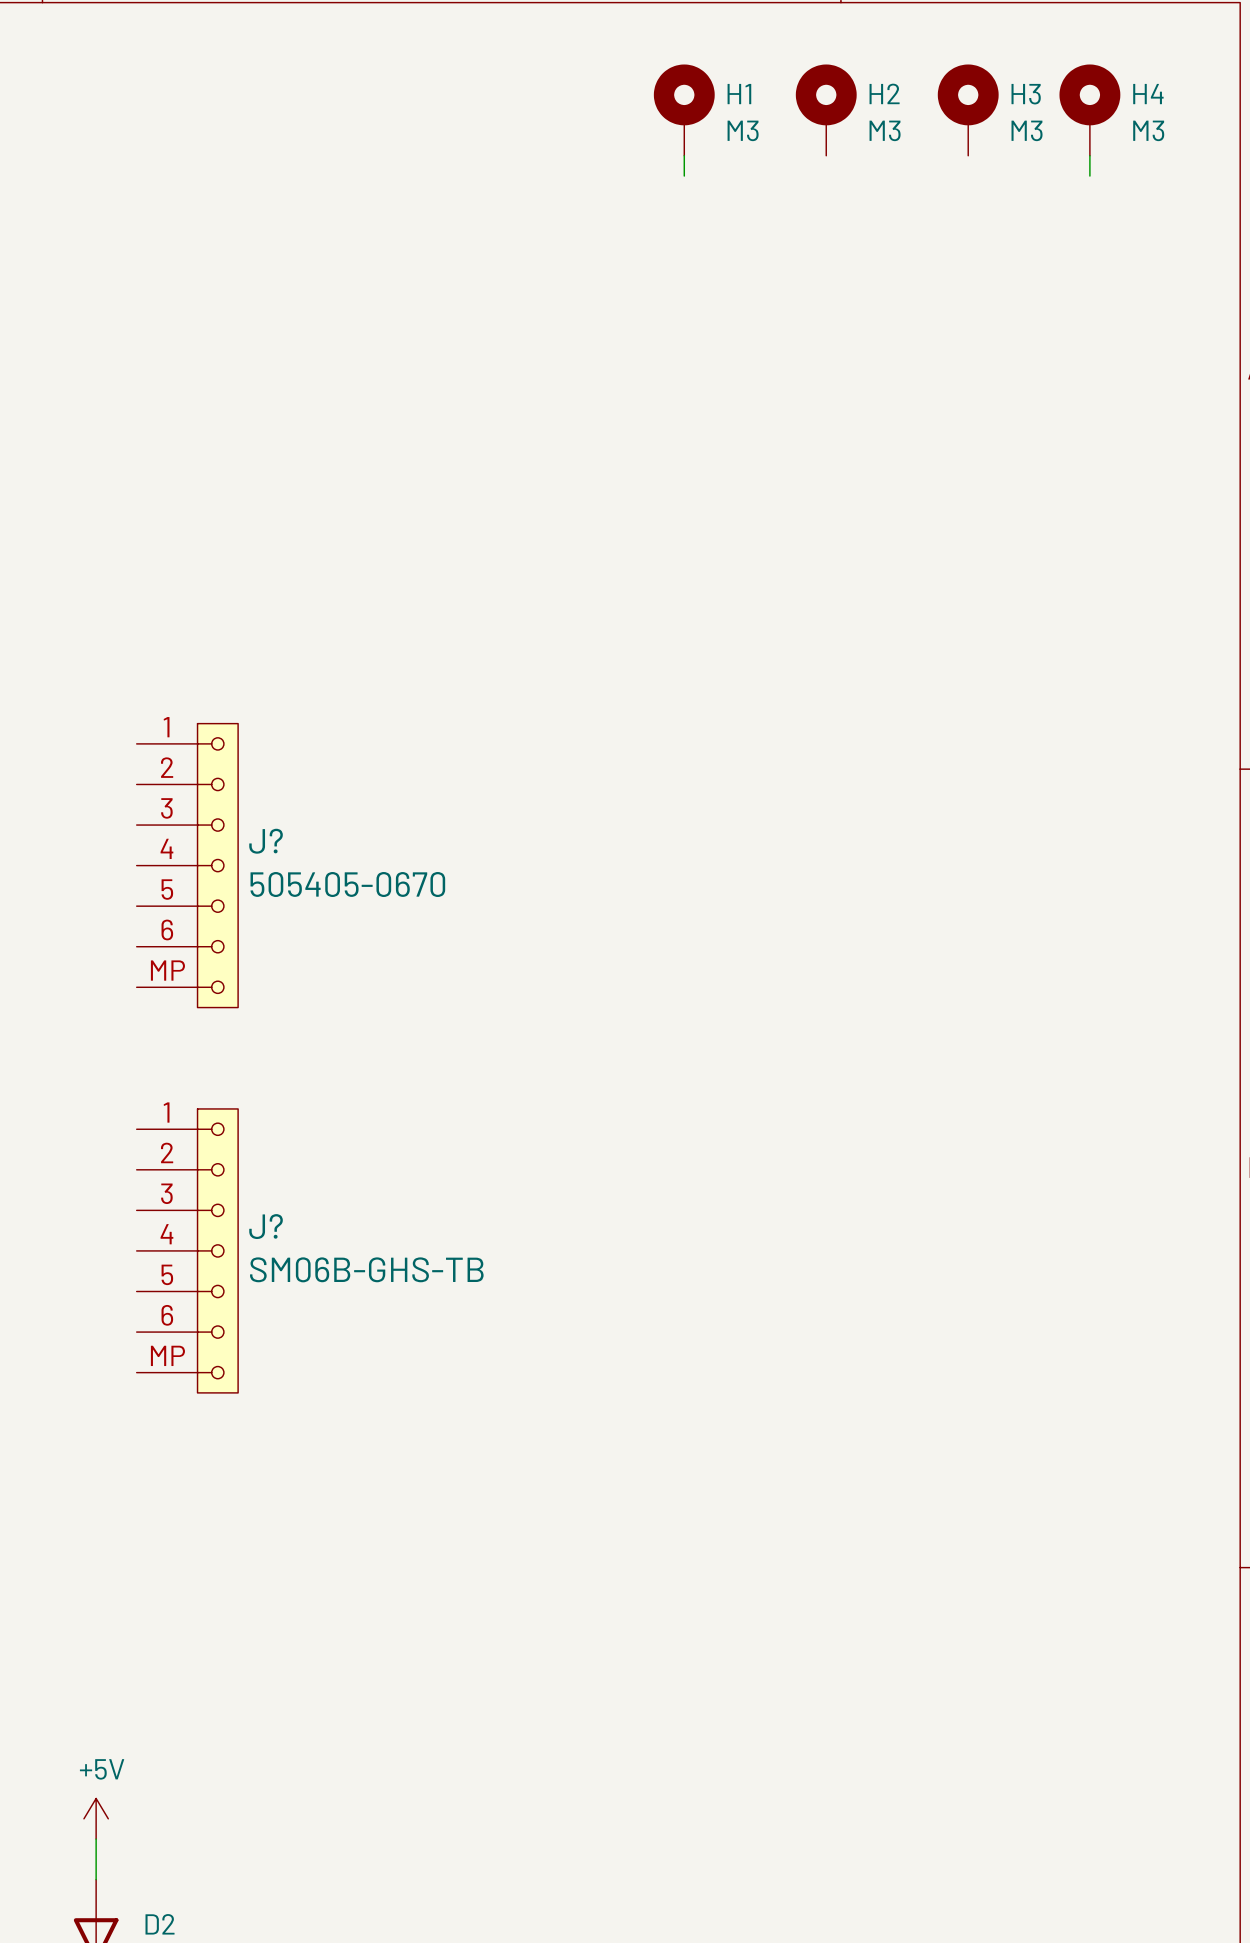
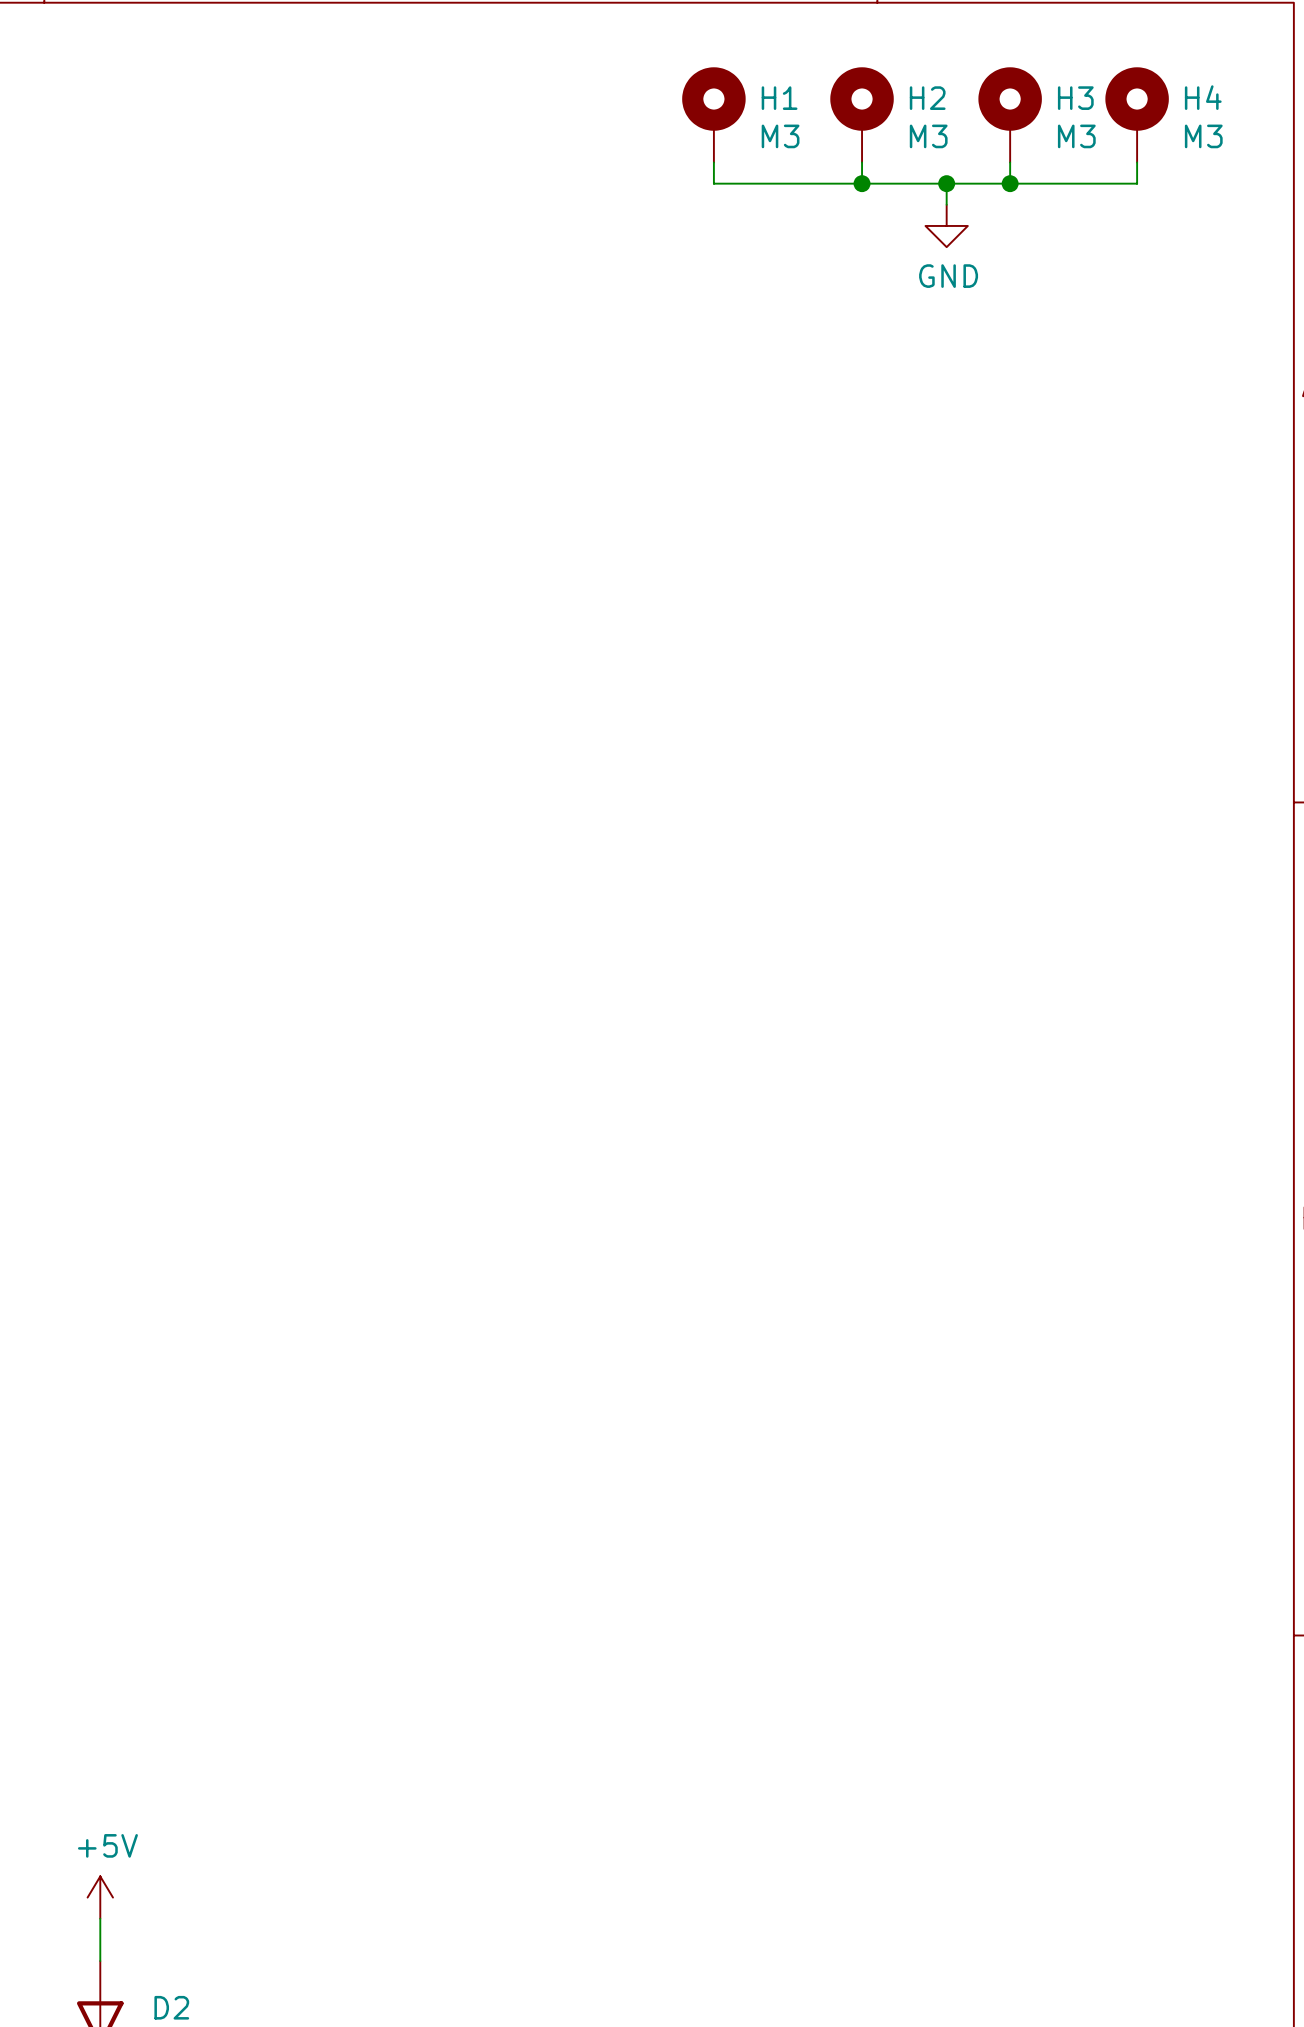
wire: none -> (862, 162) (862, 183)
wire: none -> (1010, 162) (1010, 183)
wire: none -> (713, 183) (1137, 183)
junction: none -> (862, 183)
wire: none -> (946, 183) (946, 204)
junction: none -> (946, 183)
junction: none -> (1010, 183)
power symbol: none -> GND (946, 225)
J?: 505405-0670 (187, 865) -> none
J?: SM06B-GHS-TB (187, 1250) -> none

